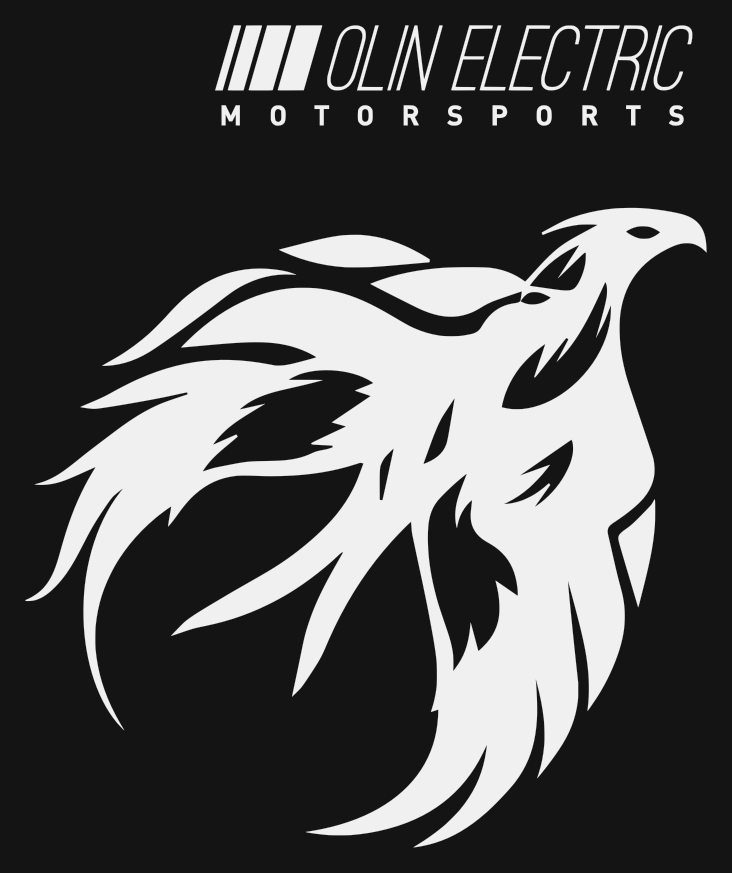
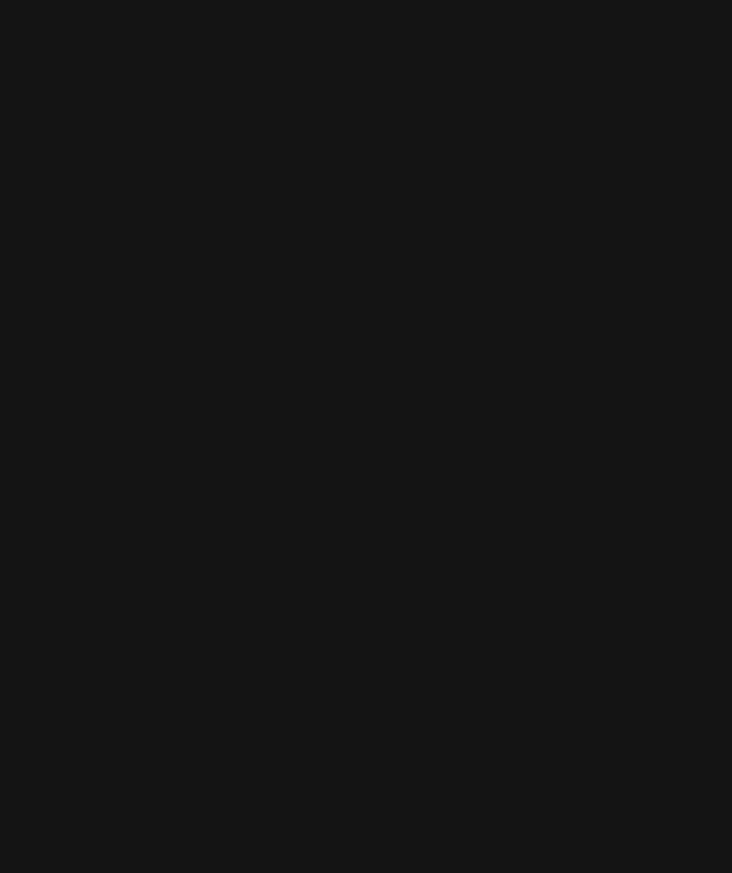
drawing: [215, 25, 693, 126] -> none
drawing: [25, 207, 707, 848] -> none

